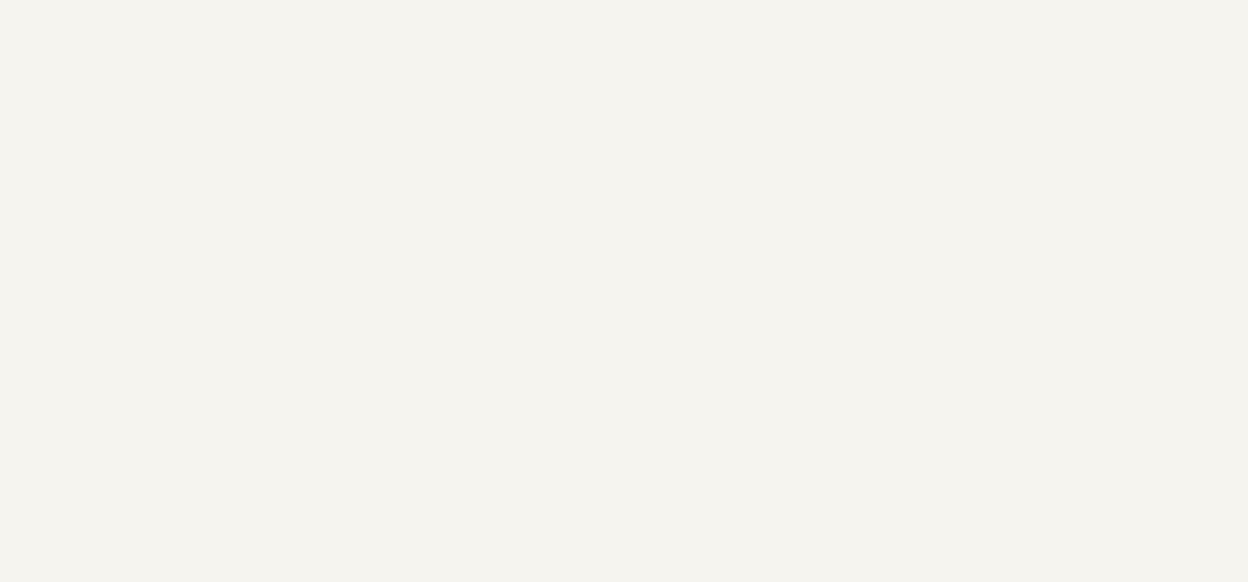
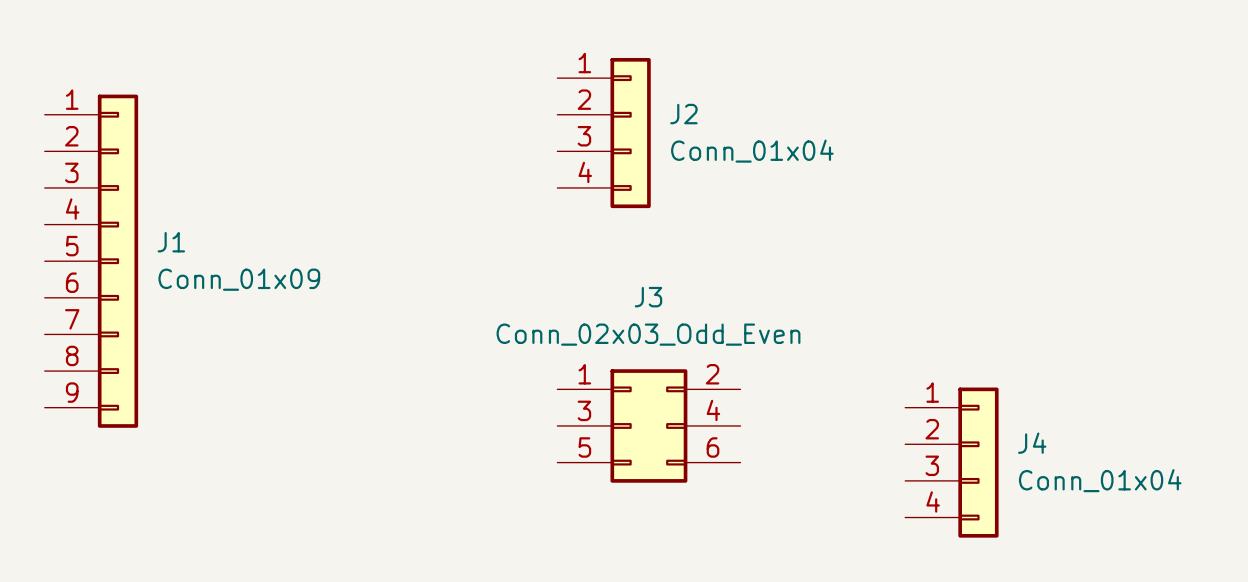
J2: none -> Conn_01x04 (604, 133)
J1: none -> Conn_01x09 (91, 261)
J3: none -> Conn_02x03_Odd_Even (648, 425)
J4: none -> Conn_01x04 (951, 462)

